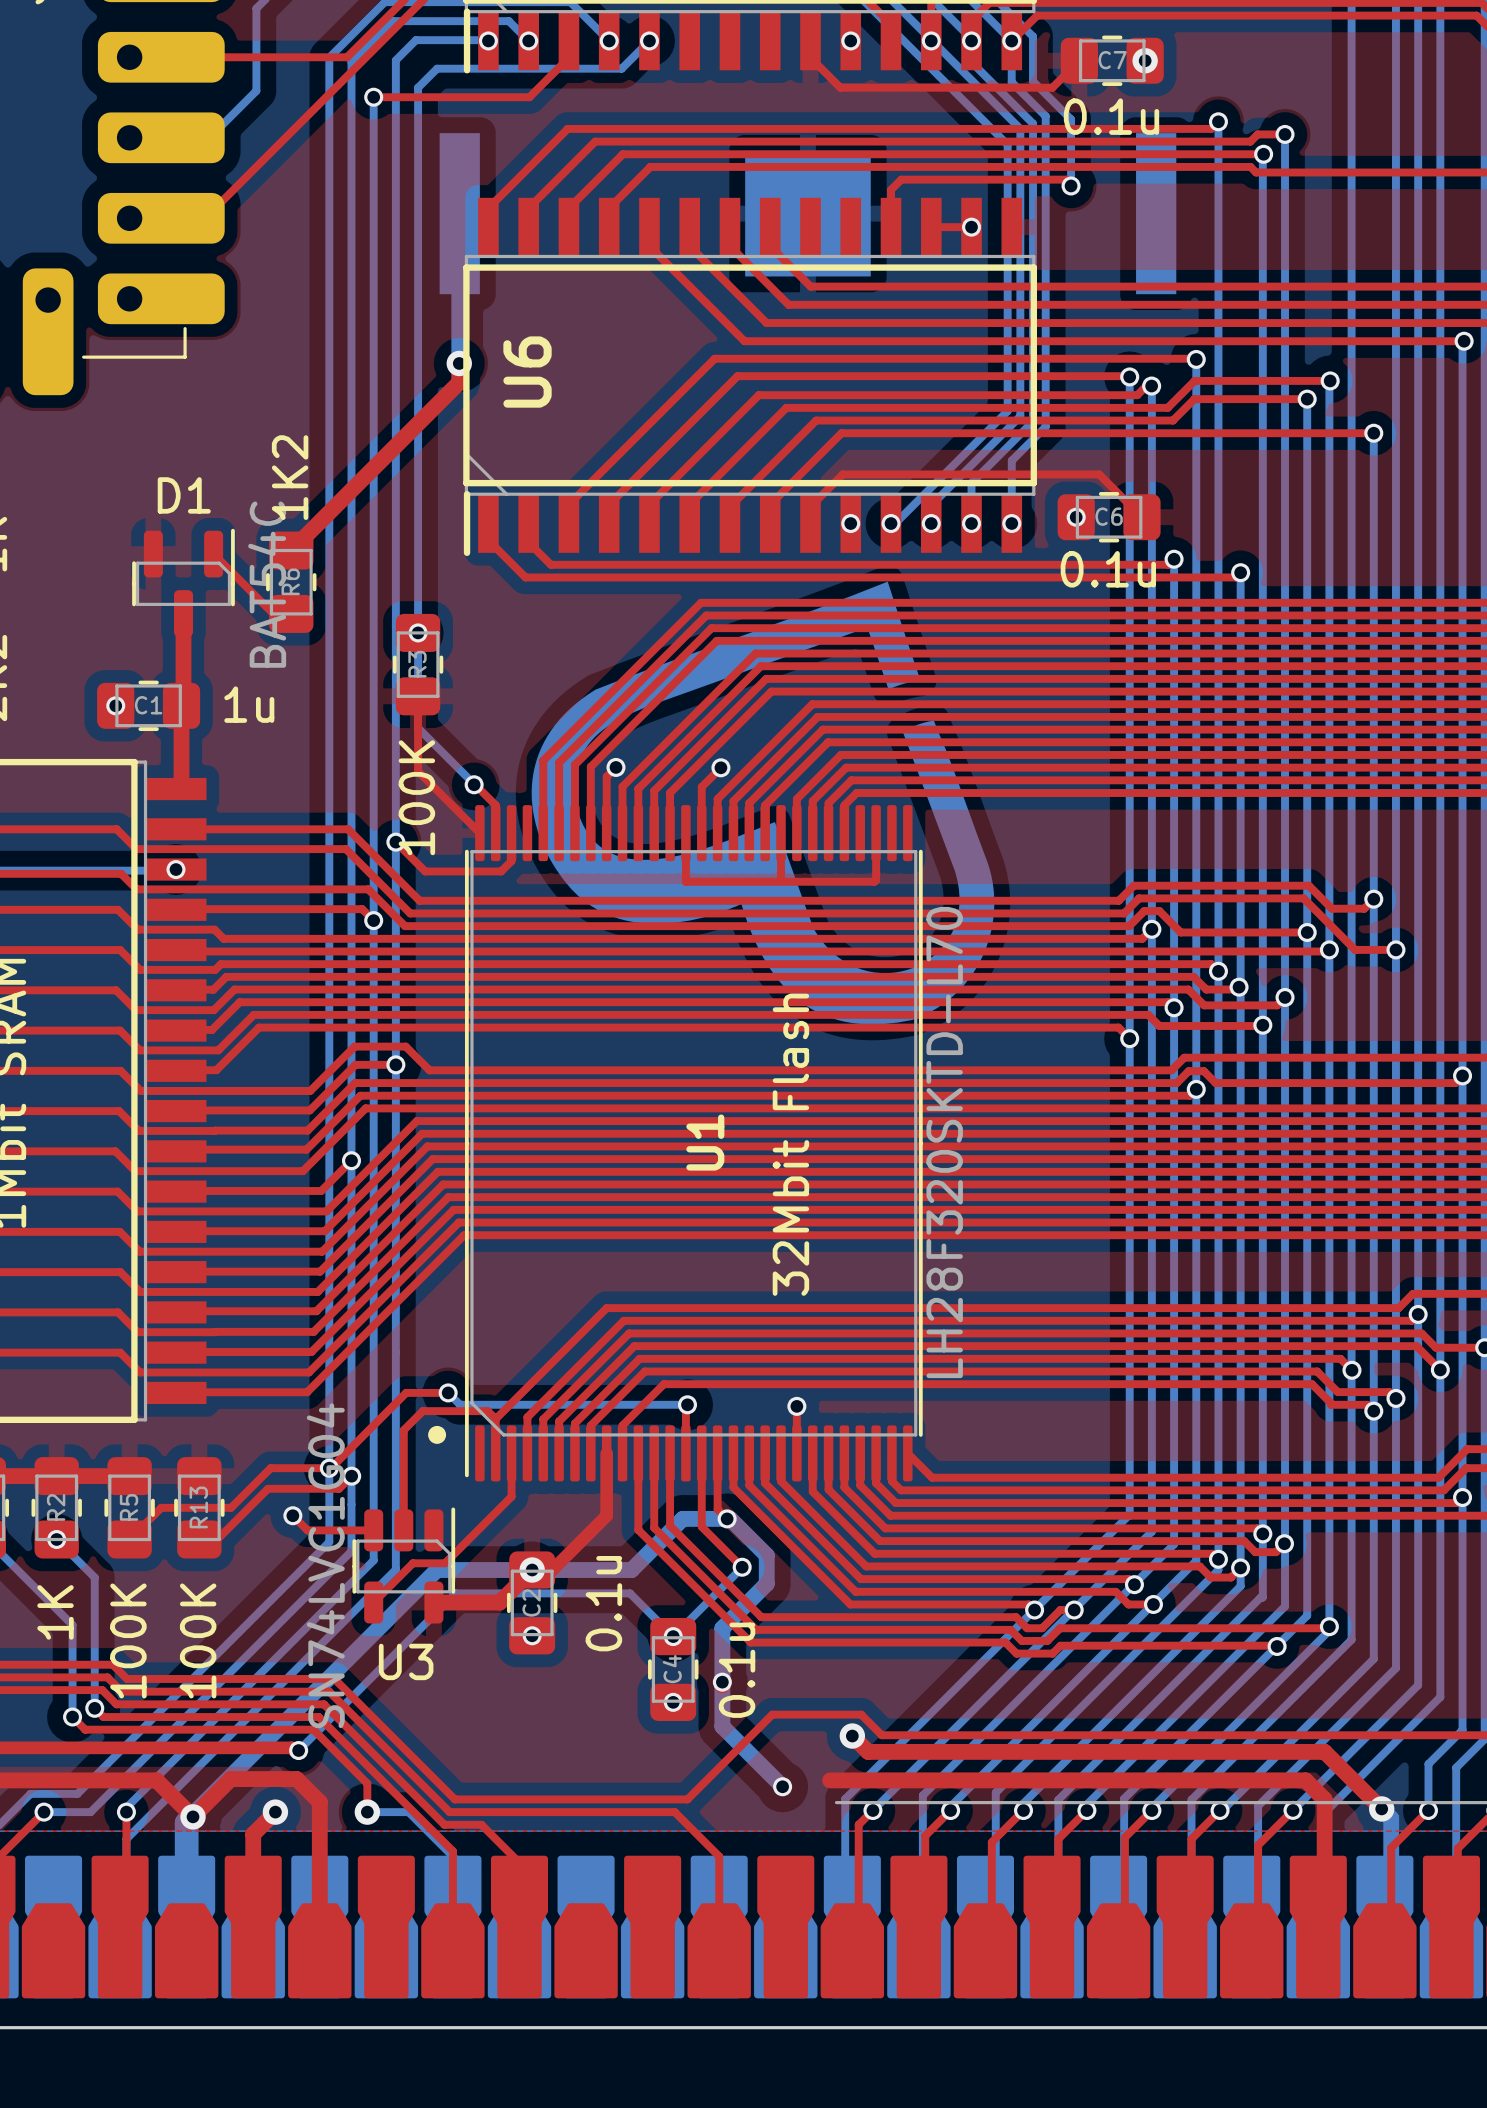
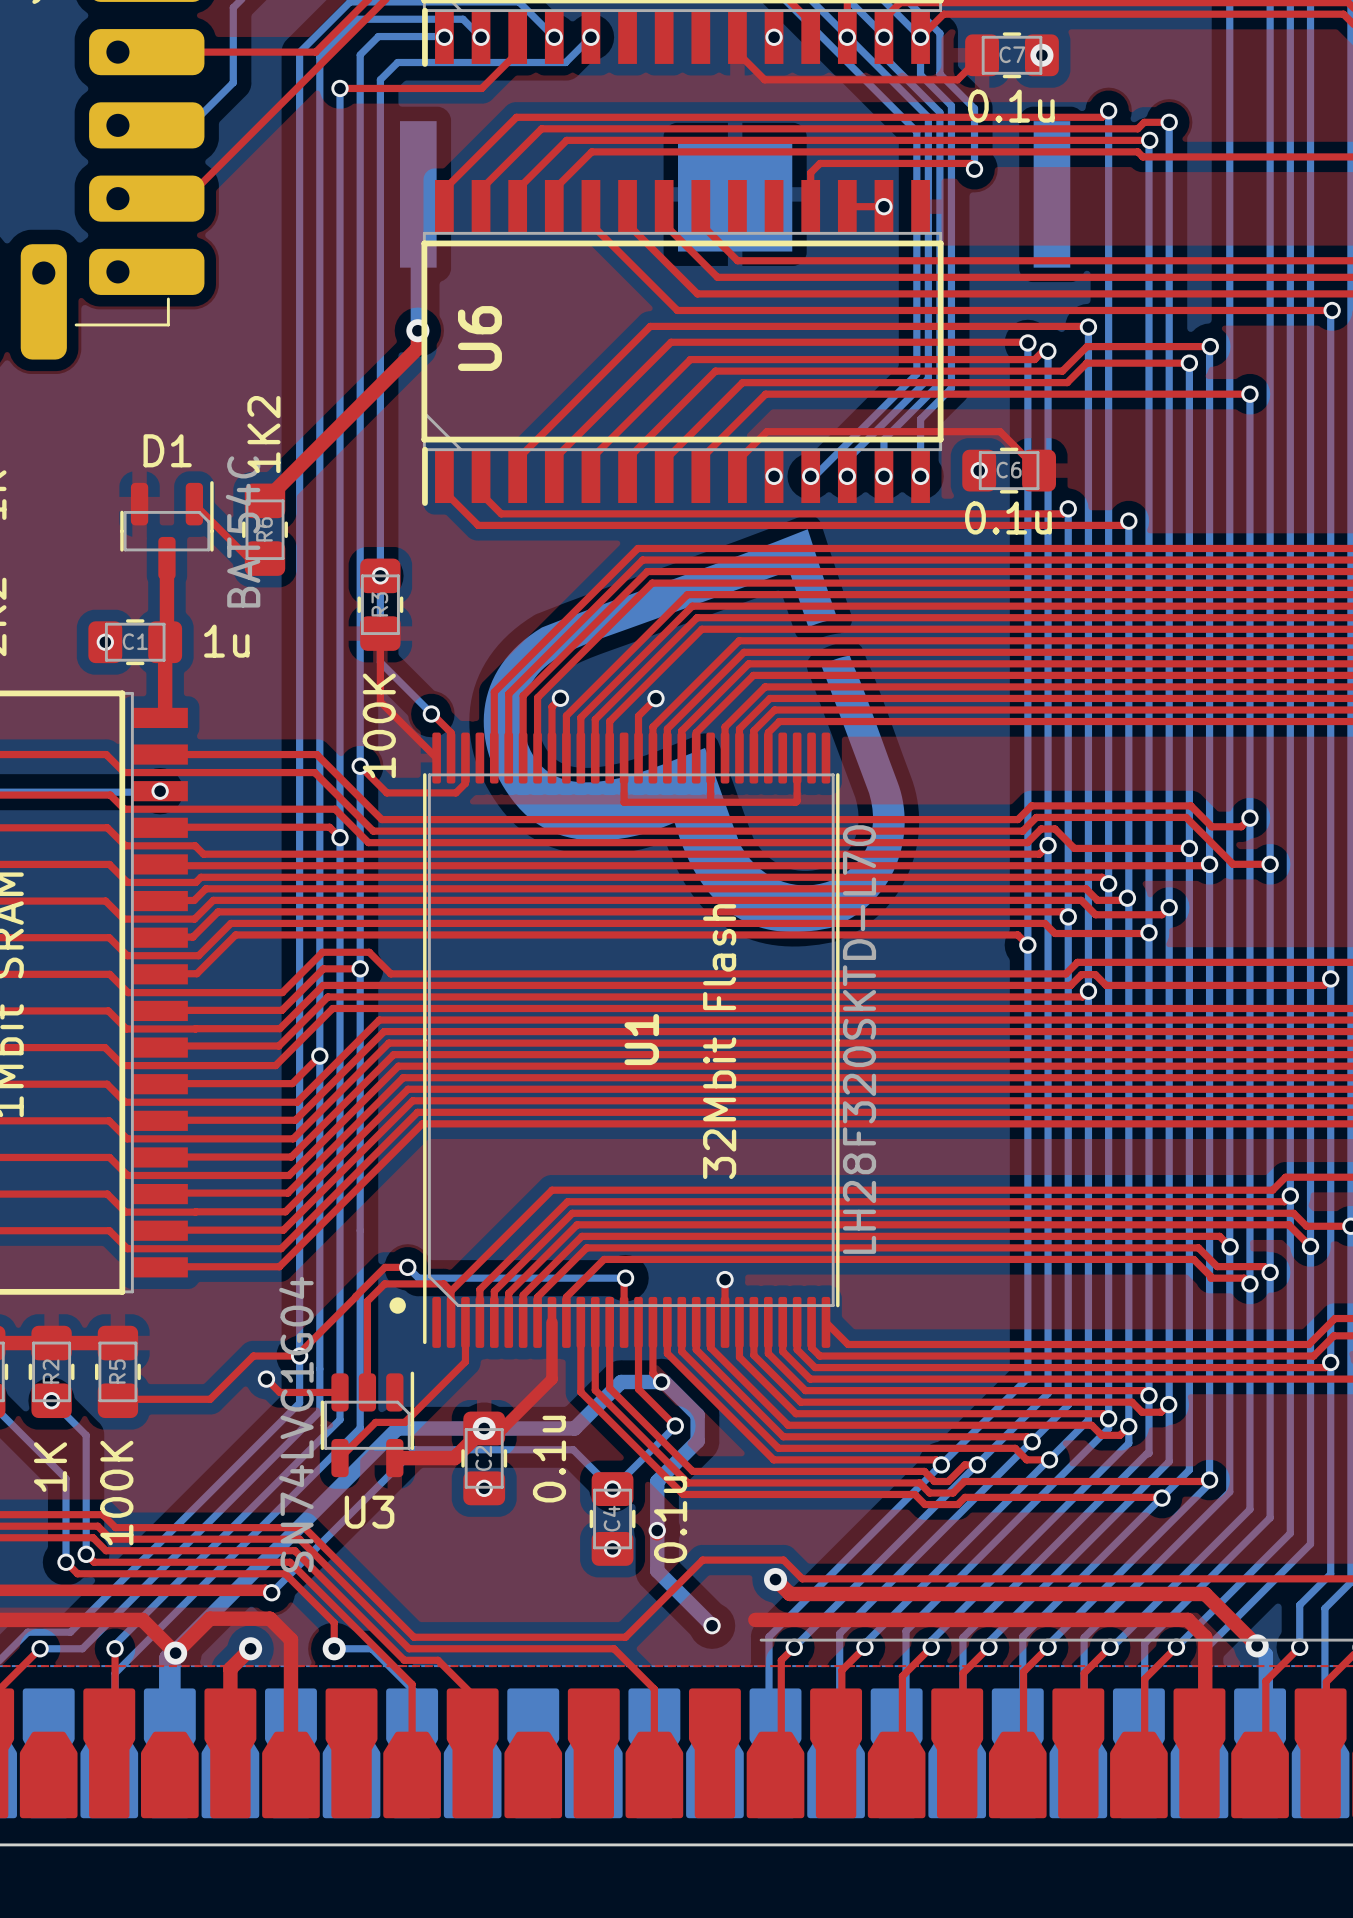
top track: (423, 1392) (406, 1392) (330, 1468) (270, 1468) (231, 1507) (161, 1507) (131, 1537) -> (355, 1296) (299, 1353) (299, 1356) (253, 1356) (210, 1399) (119, 1399)
top track: none -> (384, 1267) (355, 1296)
via: (329, 1468) -> none
top track: (351, 1476) (339, 1488) (267, 1488) (217, 1539) (199, 1539) -> none
via: (351, 1476) -> none
via: none -> (299, 1356)
R13: 100K (199, 1507) -> none

